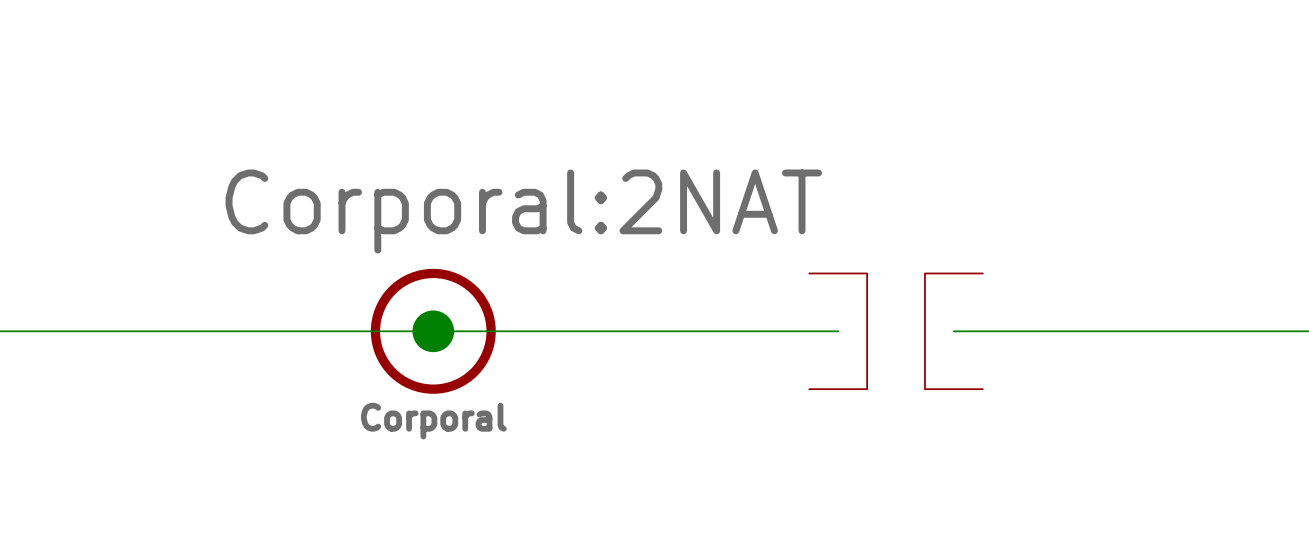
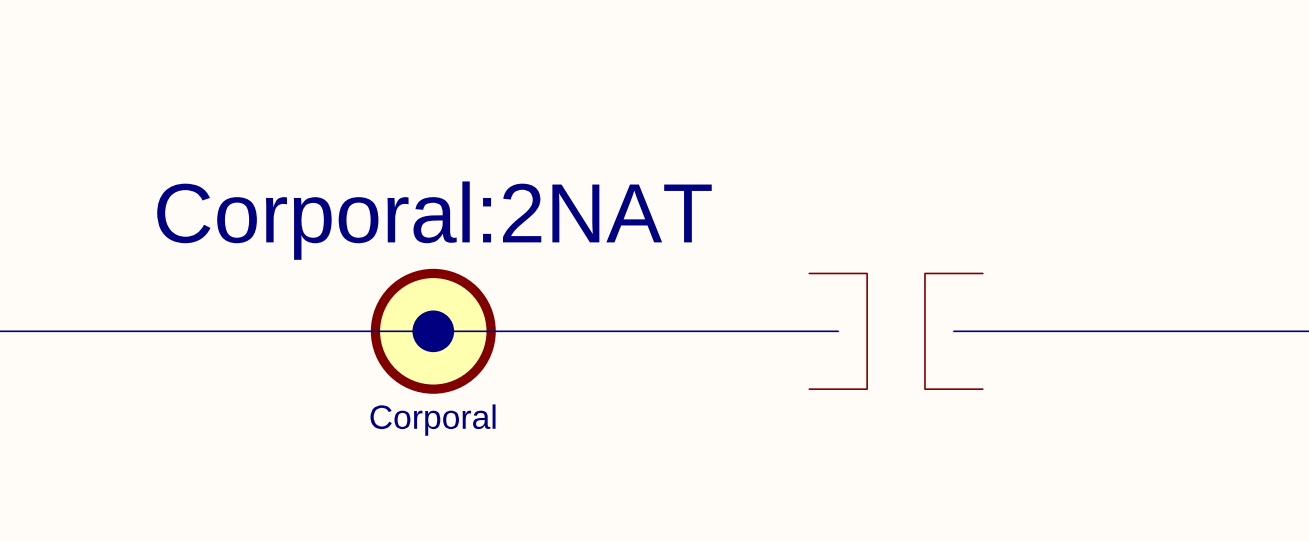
part value position: Corporal:2NAT (523, 211) -> Corporal:2NAT (434, 220)

